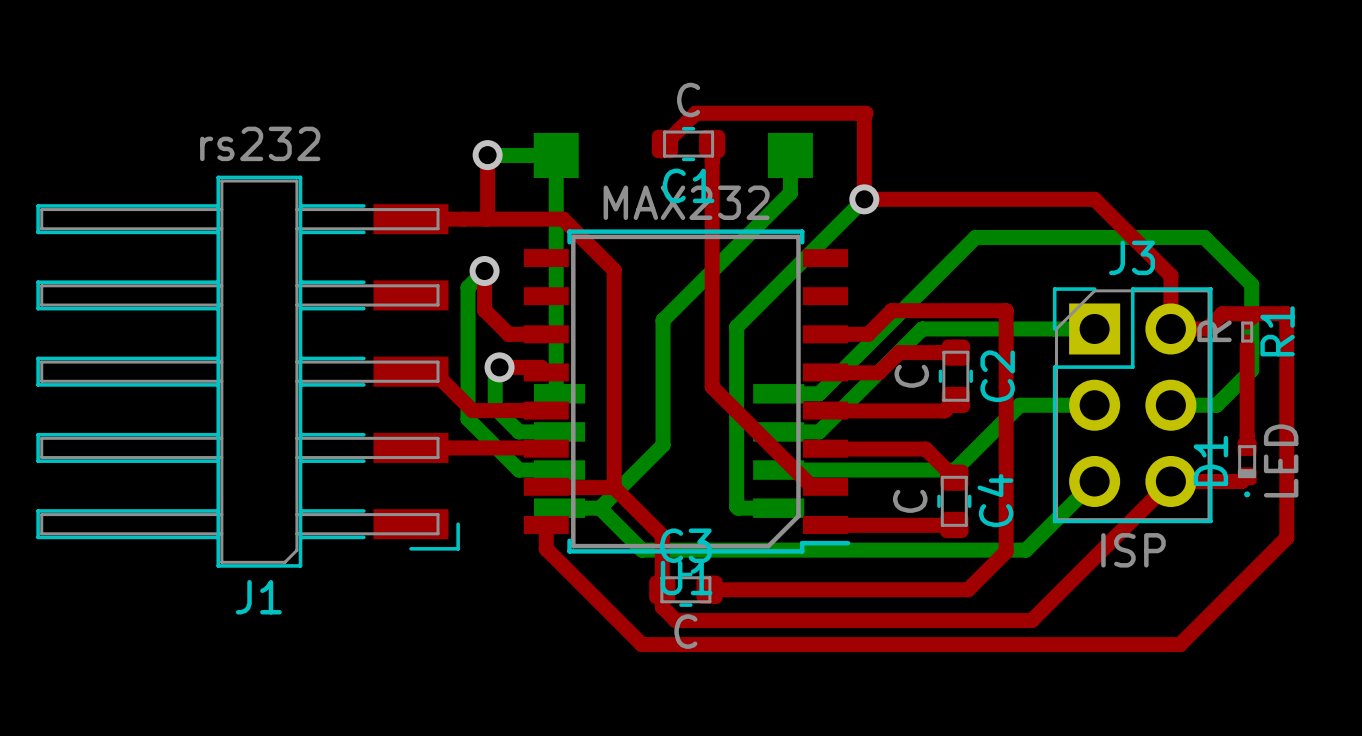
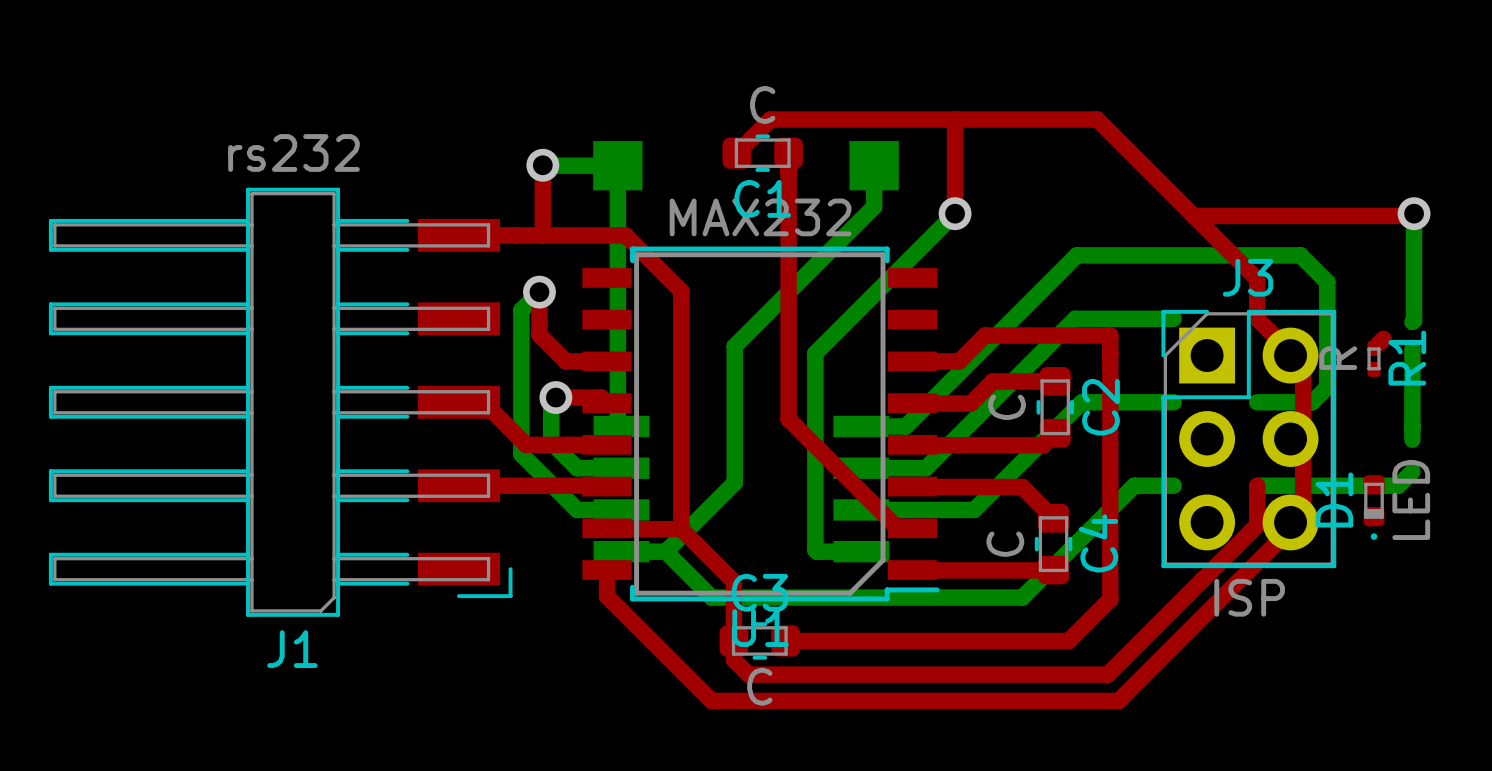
top track: (864, 199) (1094, 199) (1170, 275) (1170, 328) (1206, 328) (1222, 313) (1286, 313) (1286, 537) (1180, 644) (1013, 644) -> (956, 119) (1097, 119) (1257, 279) (1257, 318) (1303, 364) (1303, 516) (1118, 700)
top track: none -> (1414, 213) (1411, 215) (1193, 215)
bottom track: none -> (1414, 213) (1414, 320) (1412, 322)
via: none -> (1414, 213)
bottom track: (1180, 237) (1204, 237) (1251, 284) (1251, 370) (1216, 405) (1170, 405) -> (1300, 255) (1327, 282) (1327, 387) (1312, 402) (1257, 402)
bottom track: none -> (1412, 349) (1412, 439)
bottom track: (1094, 328) (922, 328) (819, 431) -> (1173, 318) (1075, 318) (925, 468) (905, 468)
top track: (1247, 345) (1247, 447) -> none
bottom track: (1094, 405) (1019, 405) (955, 470) (881, 470) -> (1173, 402) (1081, 402) (974, 509)
bottom track: none -> (1412, 471) (1398, 485) (1257, 485)
top track: (1247, 476) (1241, 481) (1170, 481) (1031, 620) (1003, 620) -> (1257, 485) (1257, 525) (1107, 674)
bottom track: (1094, 481) (1026, 550) (925, 550) -> (1173, 485) (1134, 485) (1022, 597)

